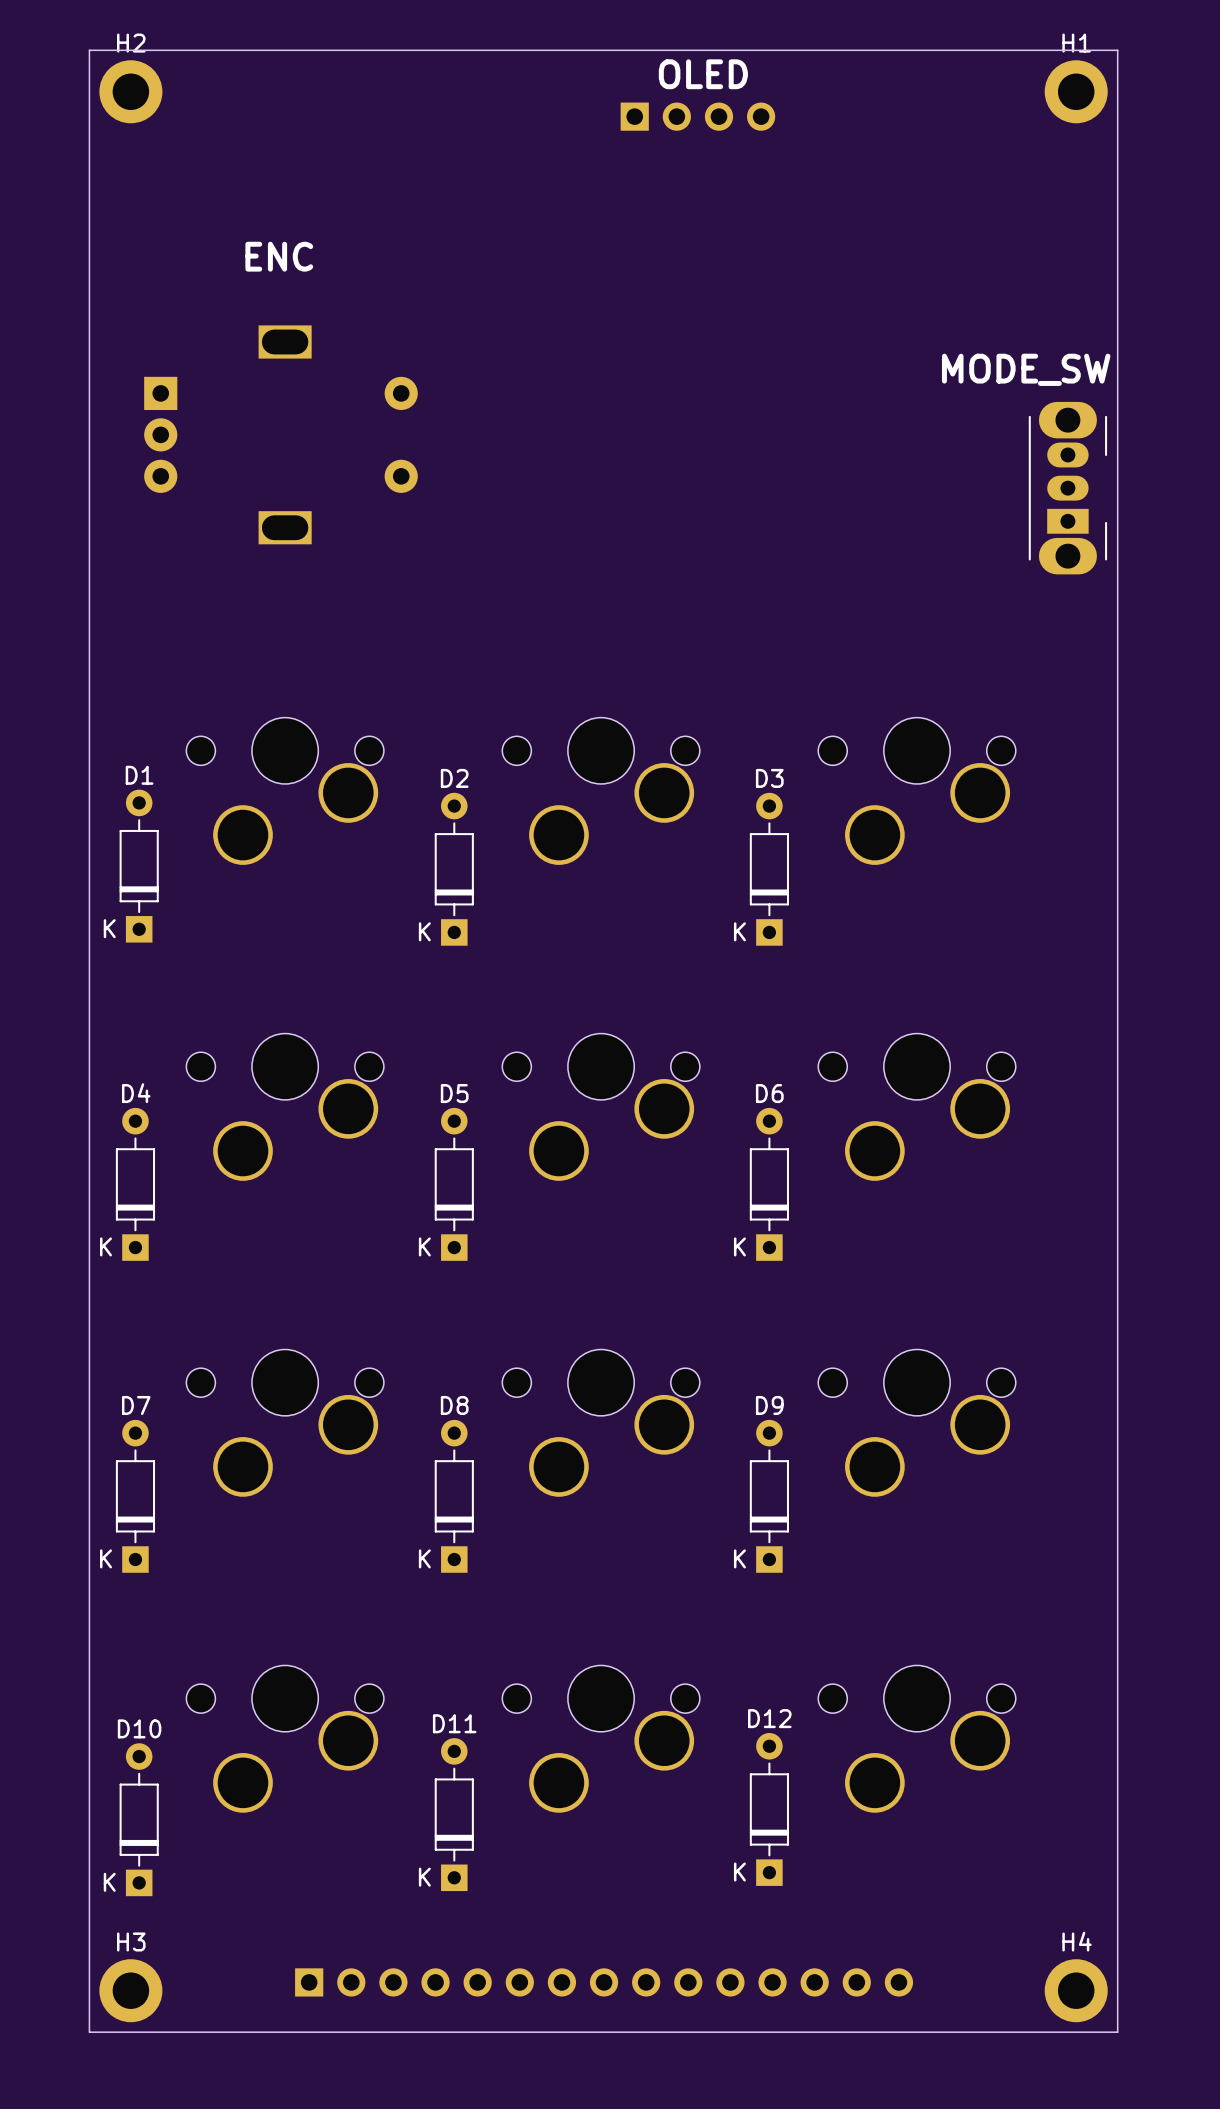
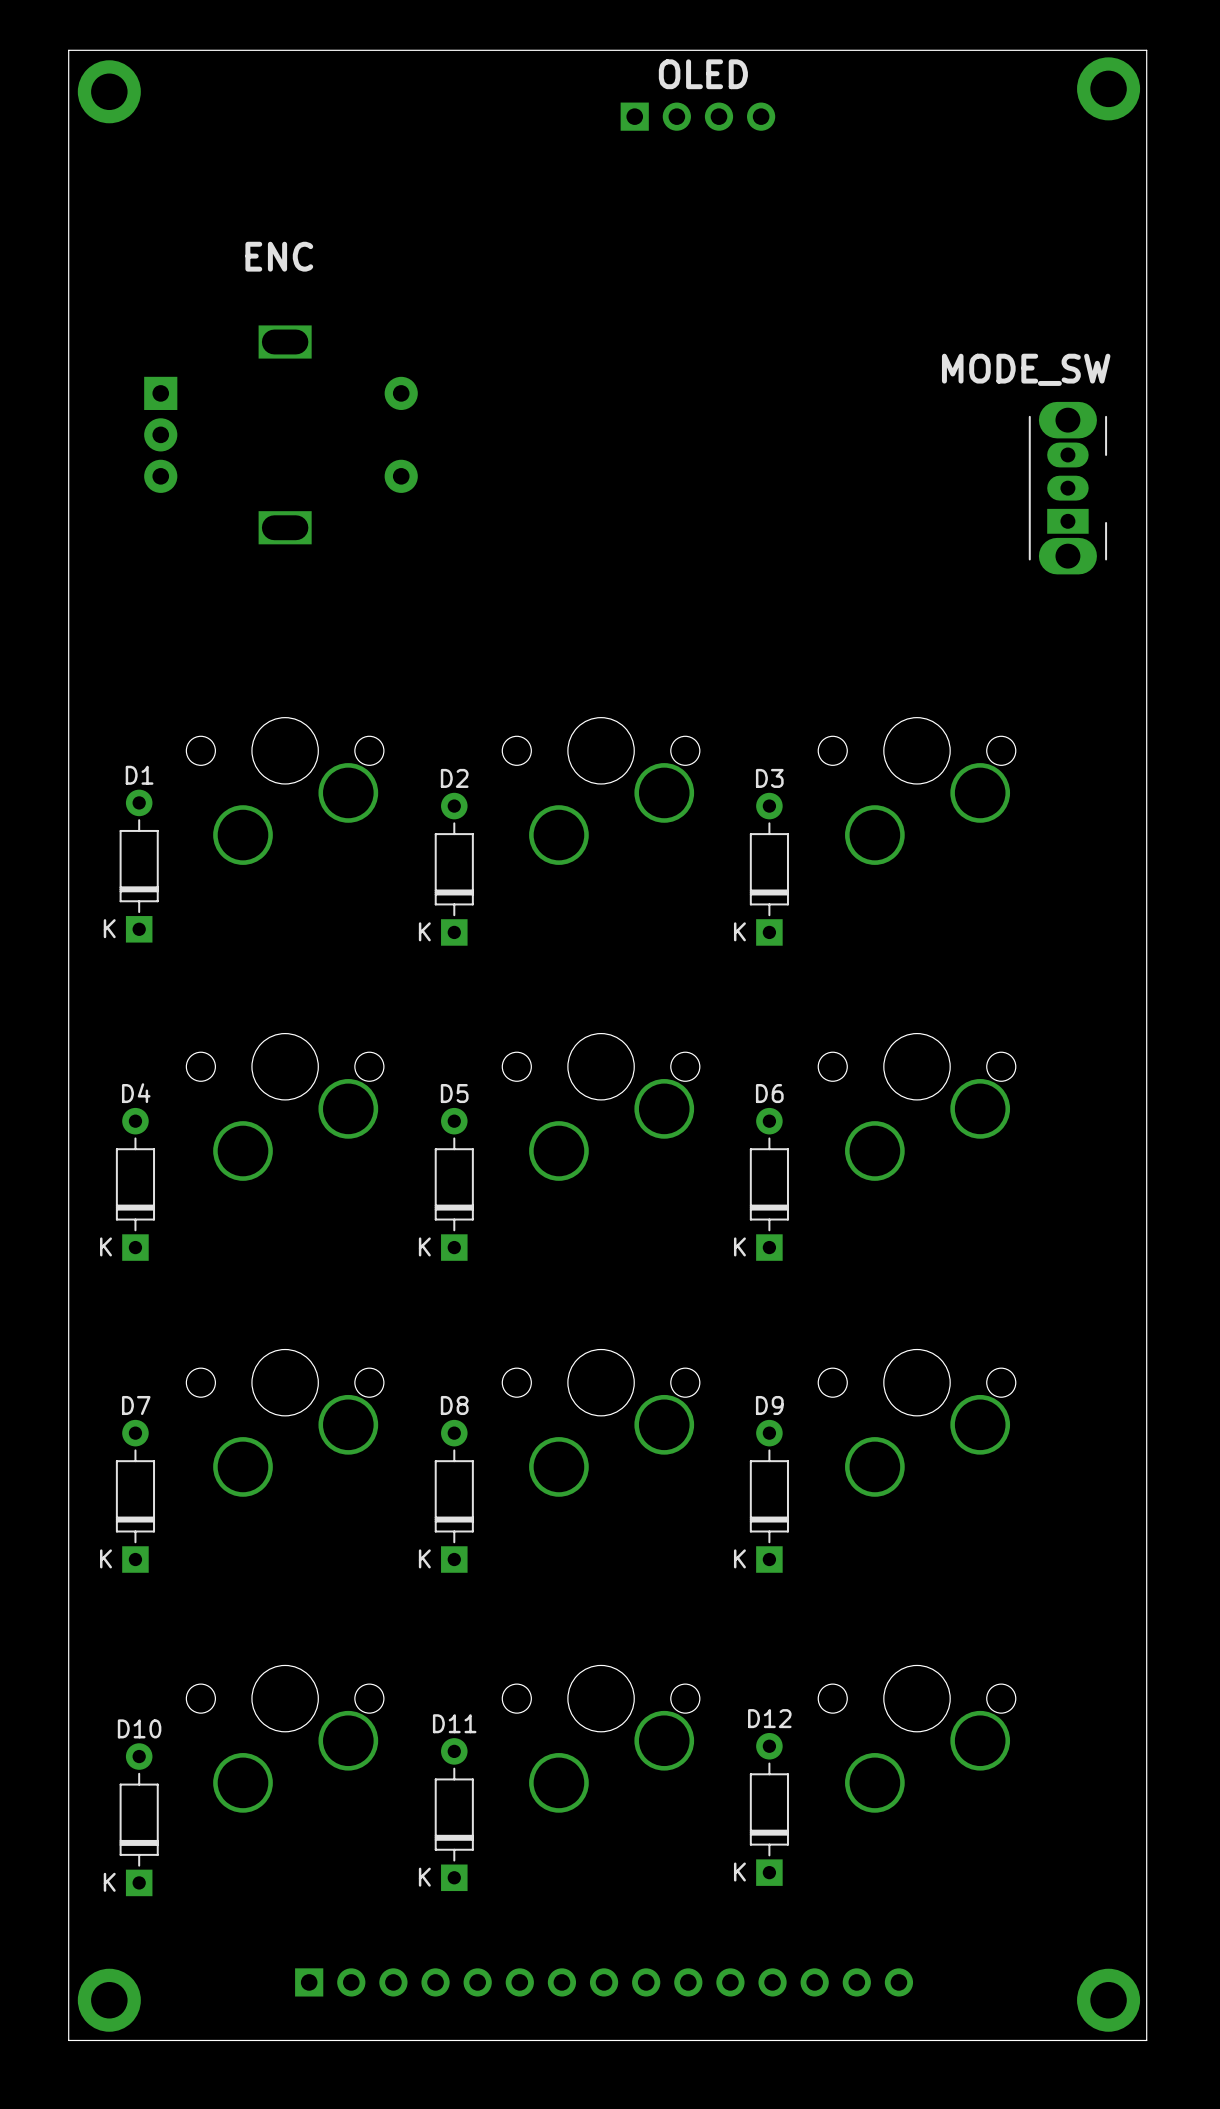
board edge: (89, 50) (89, 2032) (1117, 2032) (1117, 50) -> (89, 50) (68, 50) (68, 2040) (1146, 2040) (1146, 50) (1117, 50)
part: none -> (1108, 88)
part: none -> (109, 91)
H2: (130, 91) -> none
H1: (1076, 91) -> none
H3: (130, 1990) -> none
H4: (1076, 1990) -> none
part: none -> (109, 2000)
part: none -> (1108, 2000)

